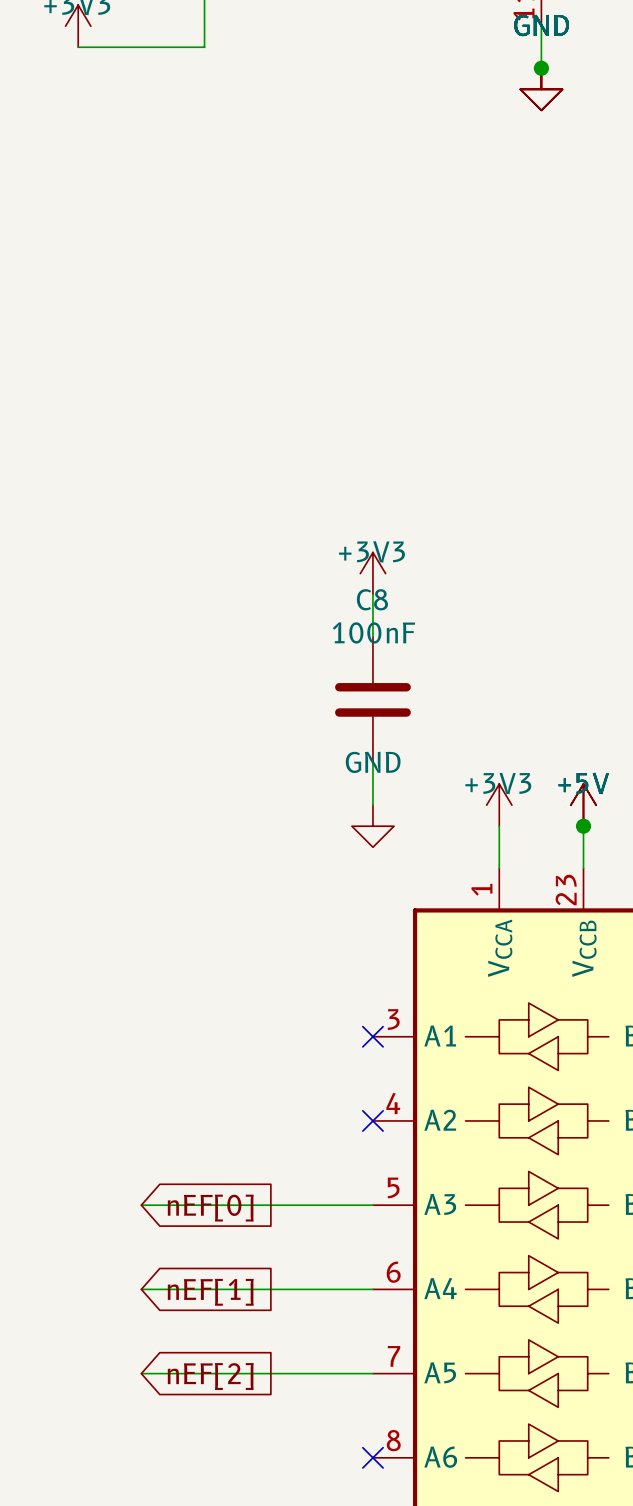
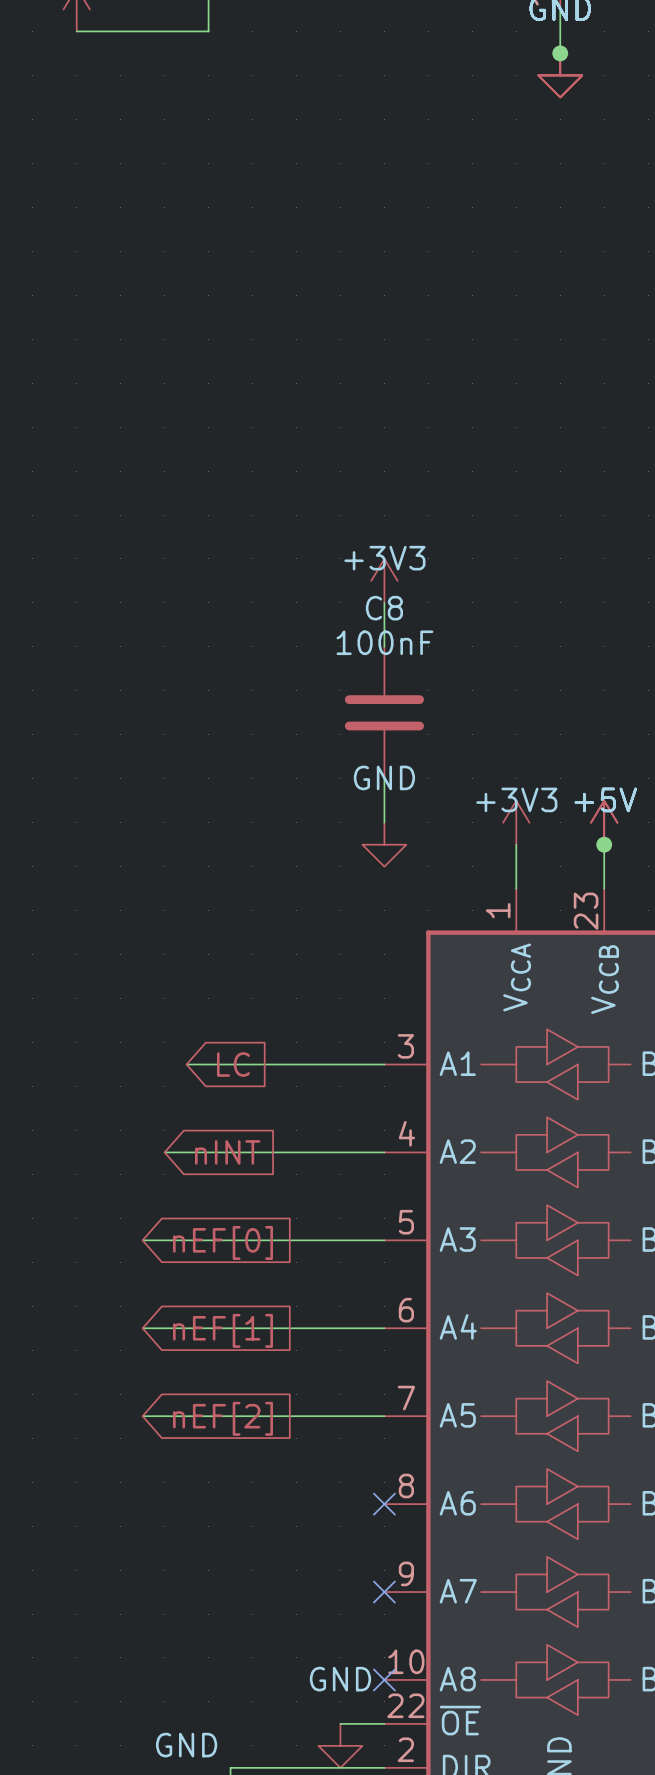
wire: none -> (186, 1064) (384, 1064)
global label: none -> LC (233, 1064)
no-connect mark: (372, 1036) -> none
wire: none -> (164, 1152) (384, 1152)
global label: none -> nINT (227, 1152)
no-connect mark: (372, 1120) -> none

